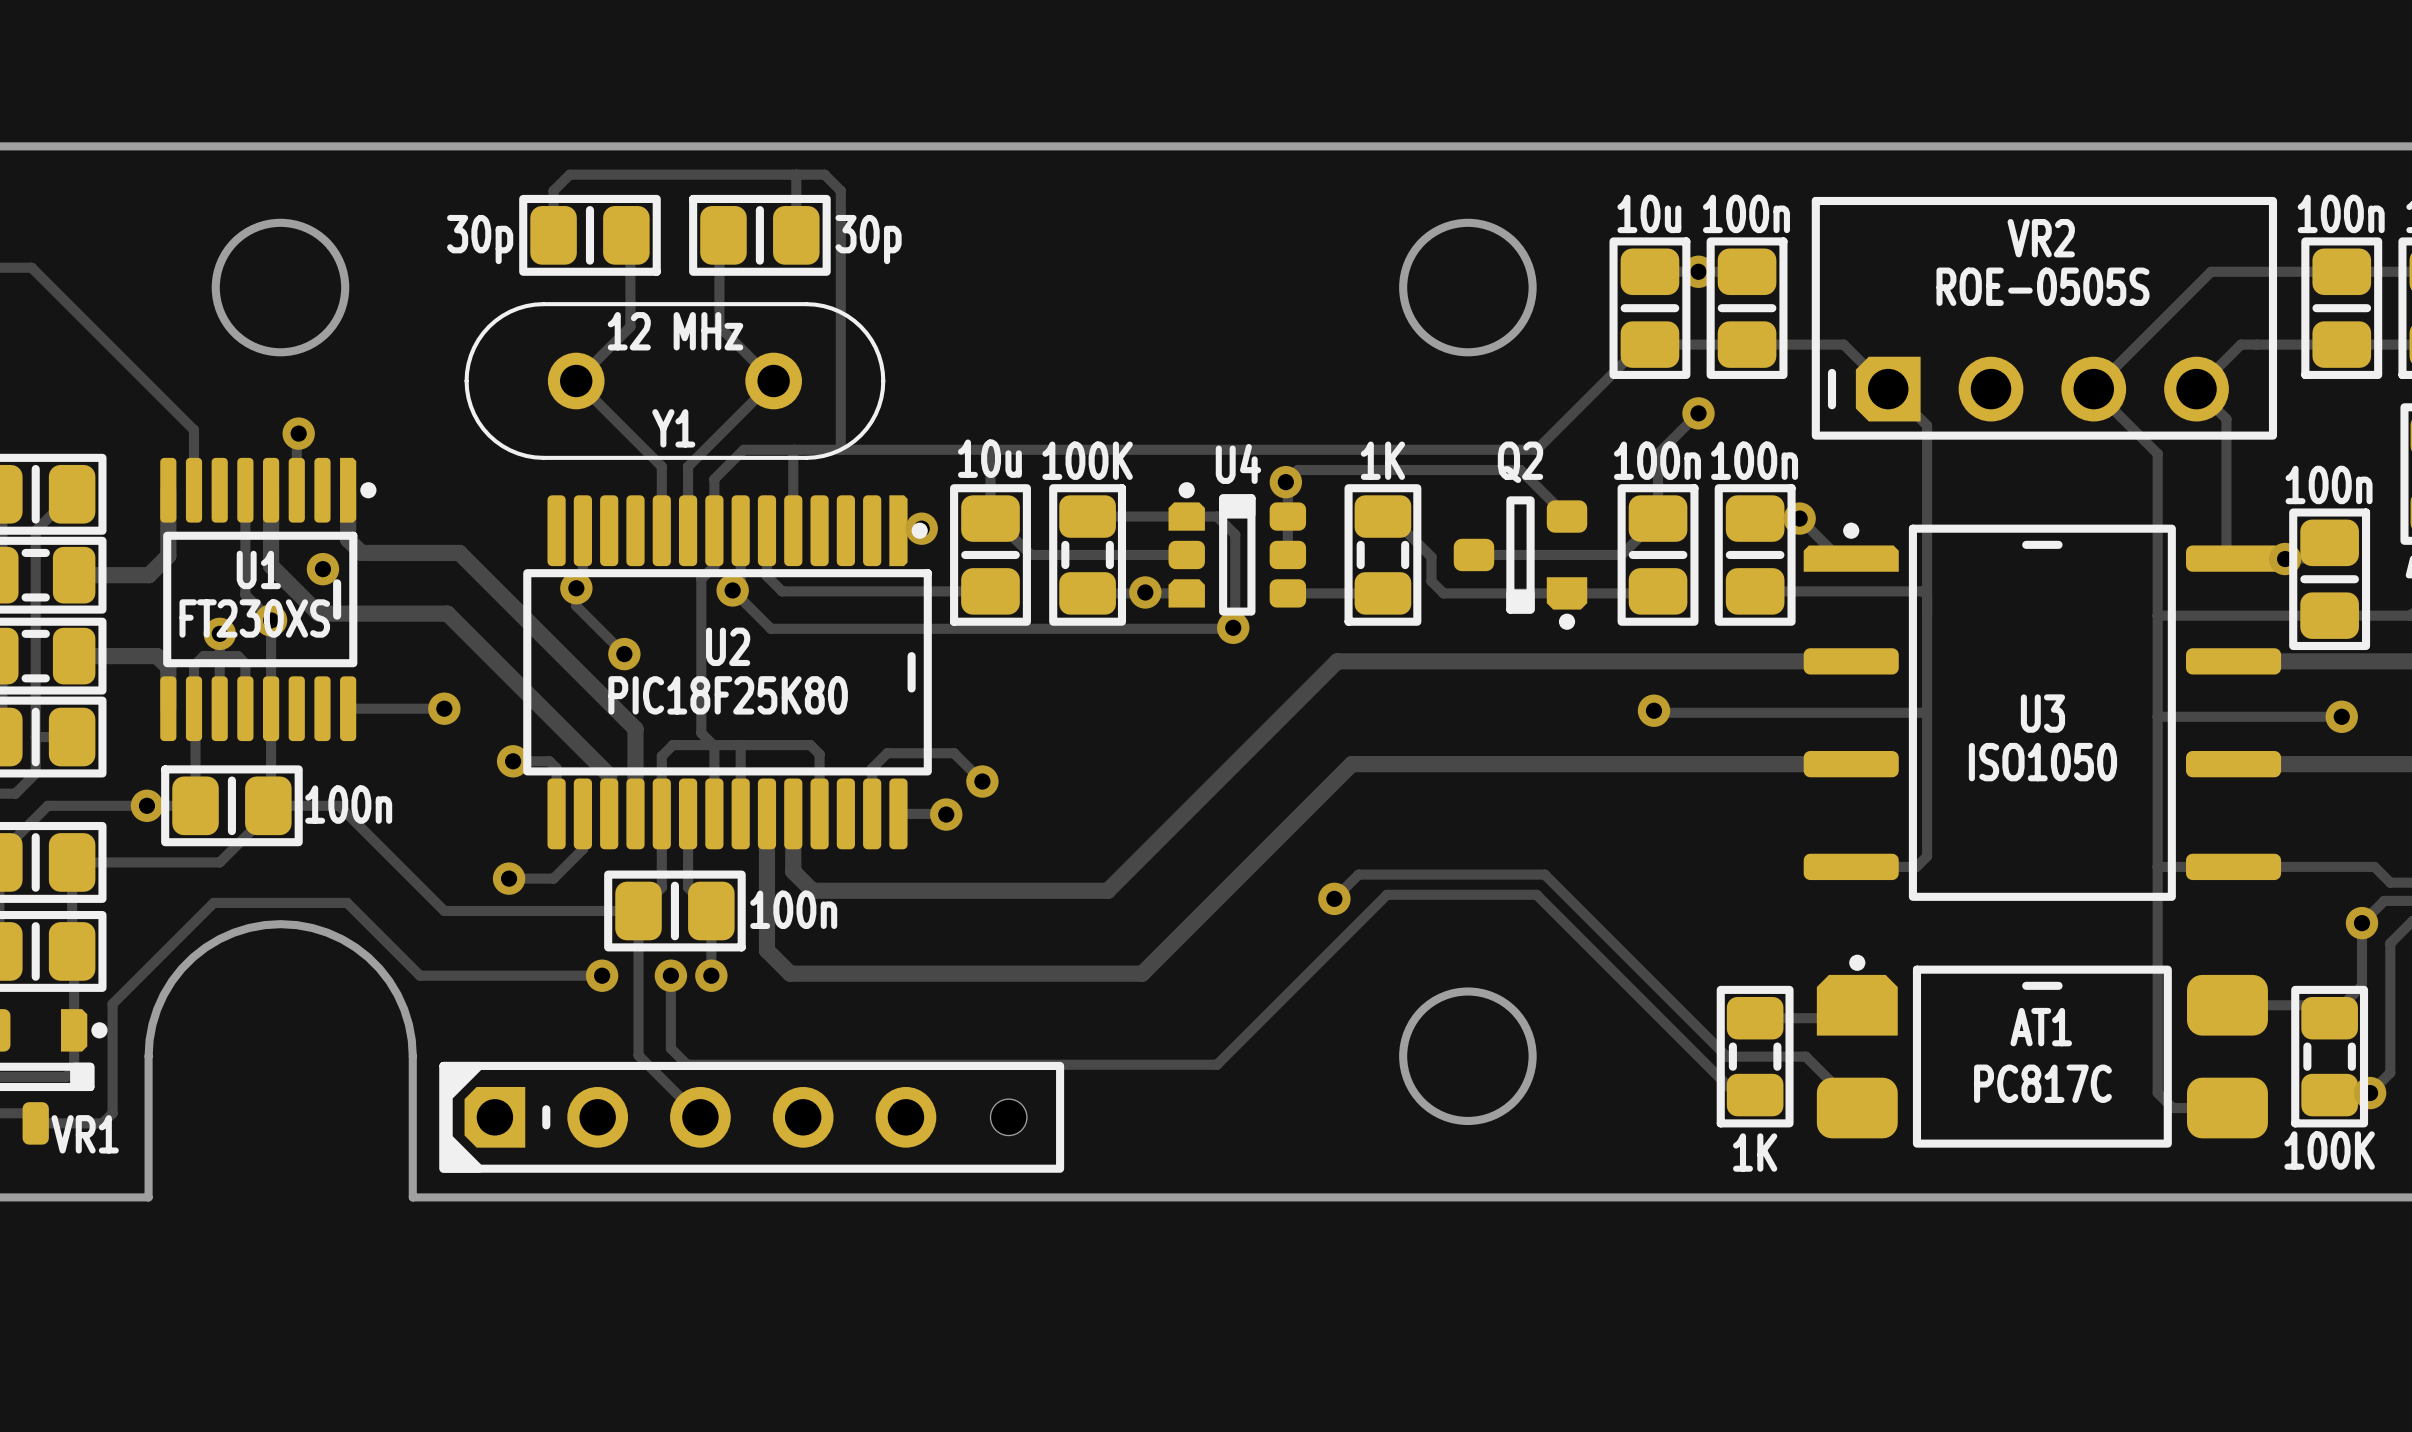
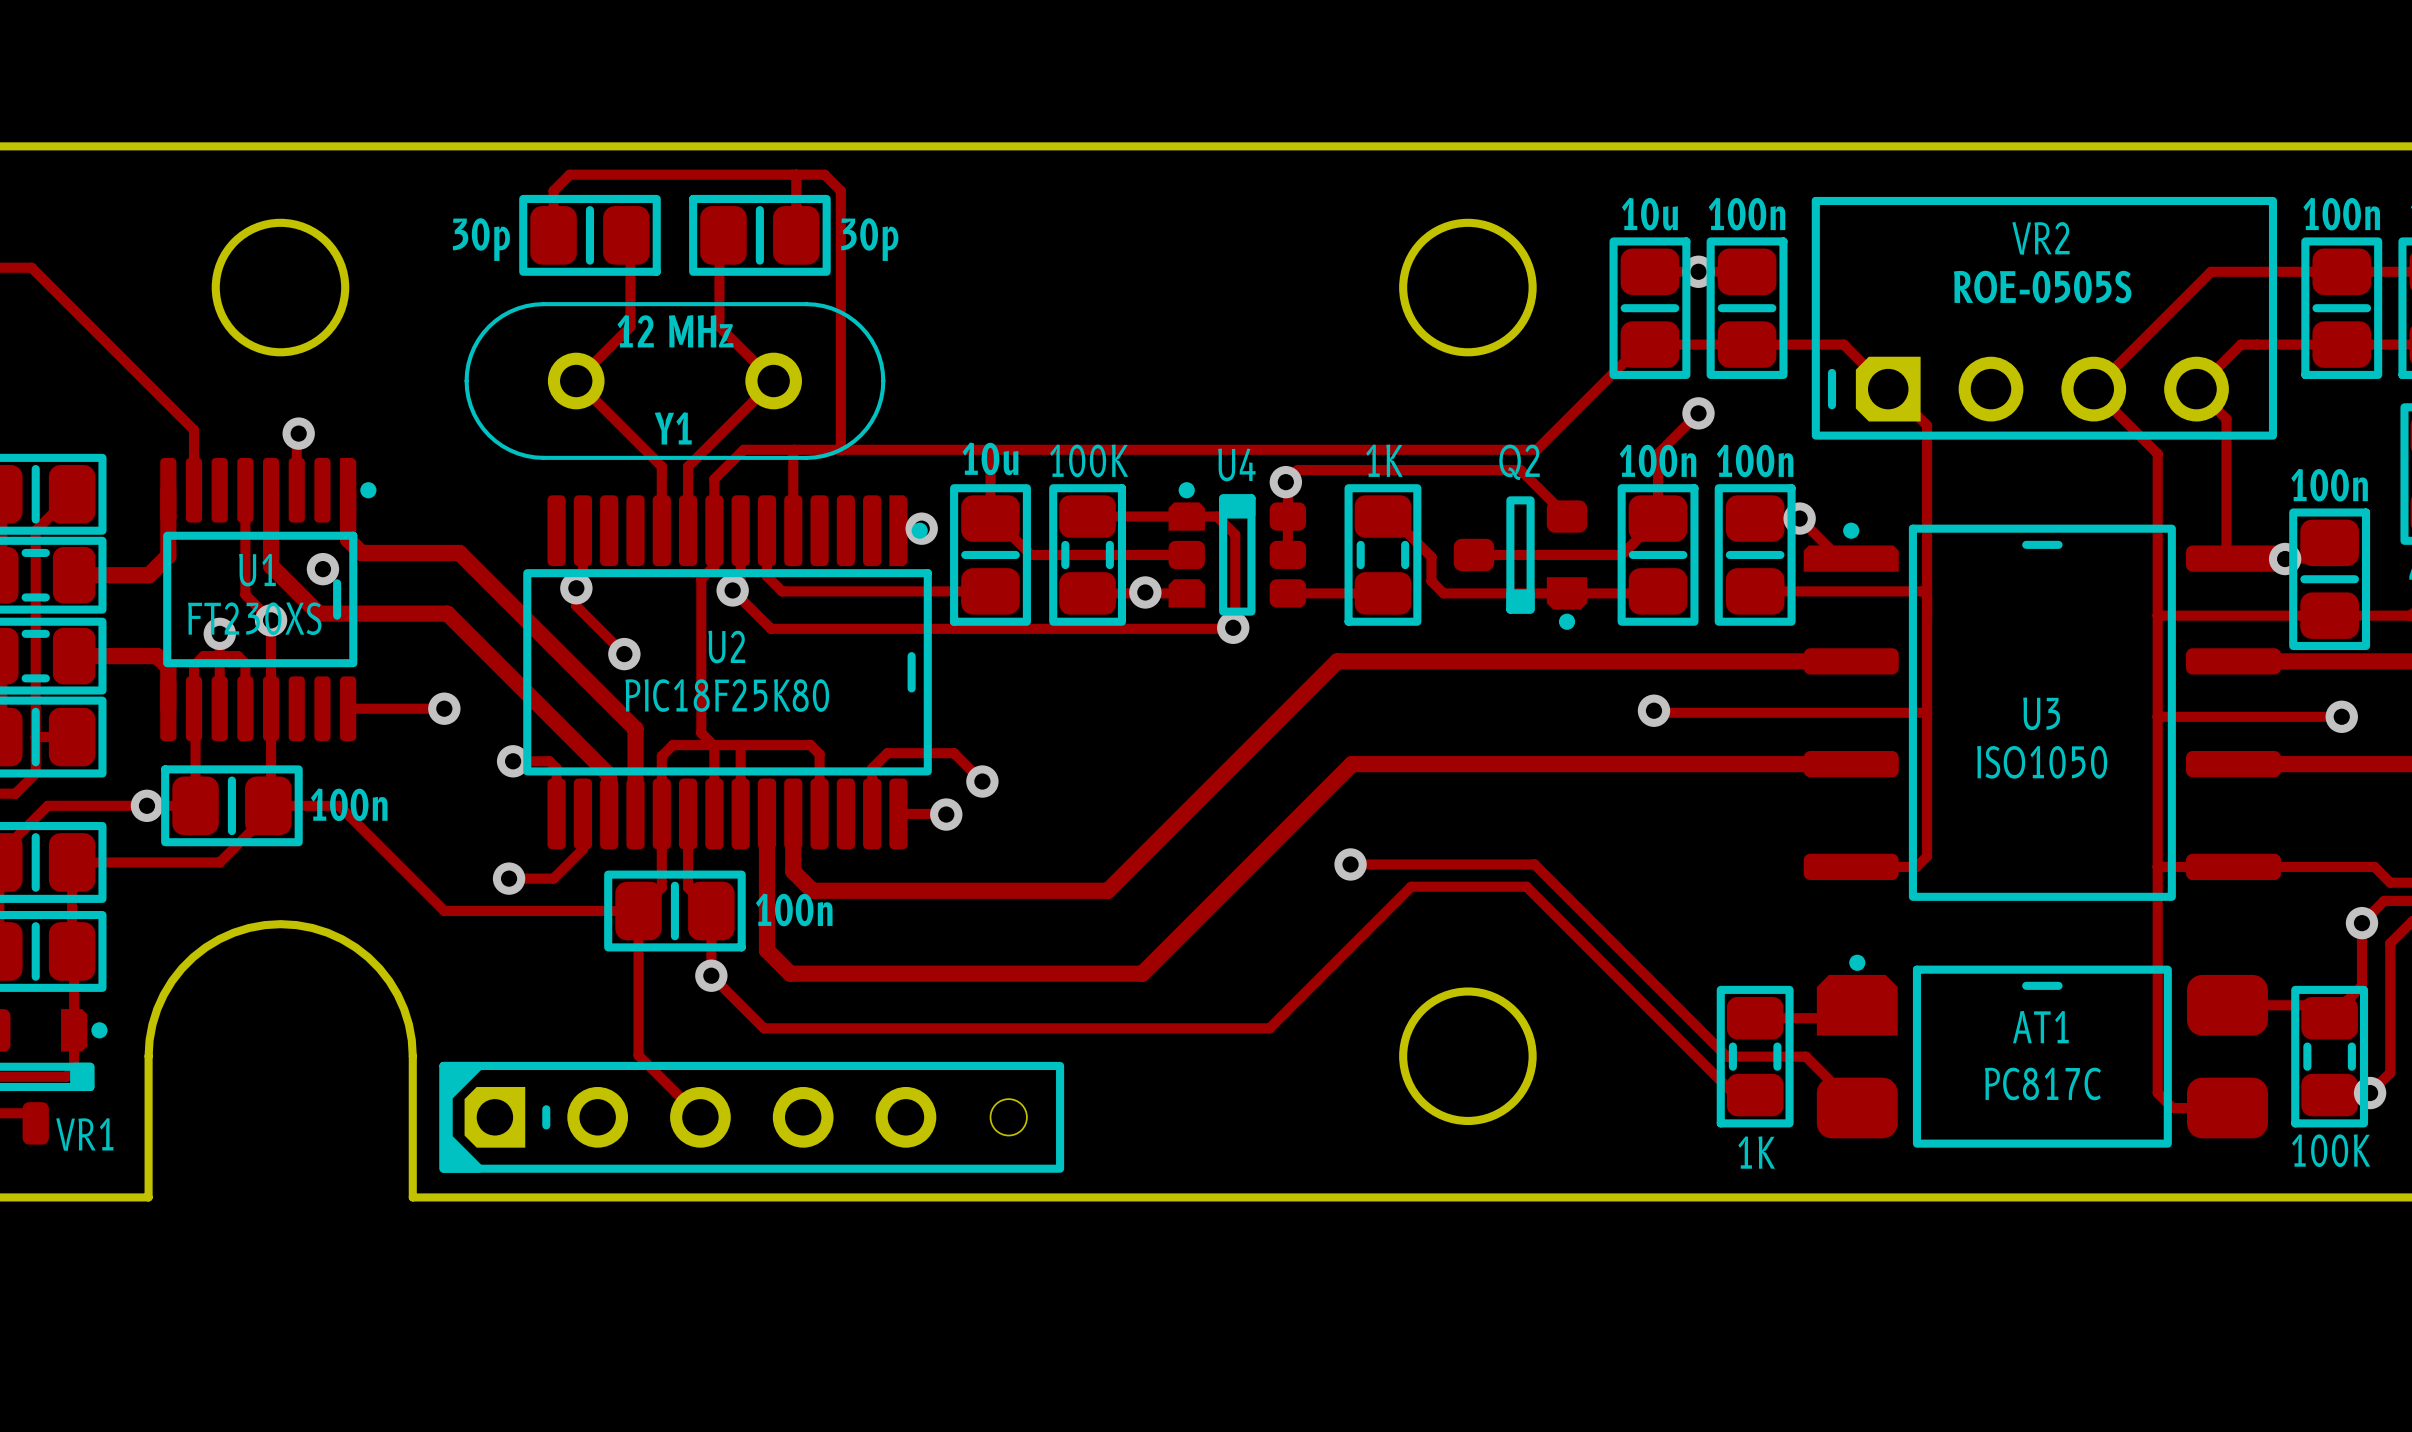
track: (1544, 874) (1358, 874) (1334, 898) -> (1544, 874) (1534, 864) (1350, 864)
via position: (1334, 898) -> (1350, 864)
track: (602, 975) (420, 975) (347, 902) (213, 902) (112, 1004) (112, 1113) (102, 1123) (35, 1123) -> none
via: (602, 975) -> none
track: (670, 975) (670, 1048) (687, 1064) (1217, 1064) (1386, 894) (1536, 894) (1736, 1095) -> none
via: (670, 975) -> none
track: none -> (711, 975) (763, 1028) (1269, 1028) (1411, 886) (1526, 886) (1734, 1095) (1755, 1095)

